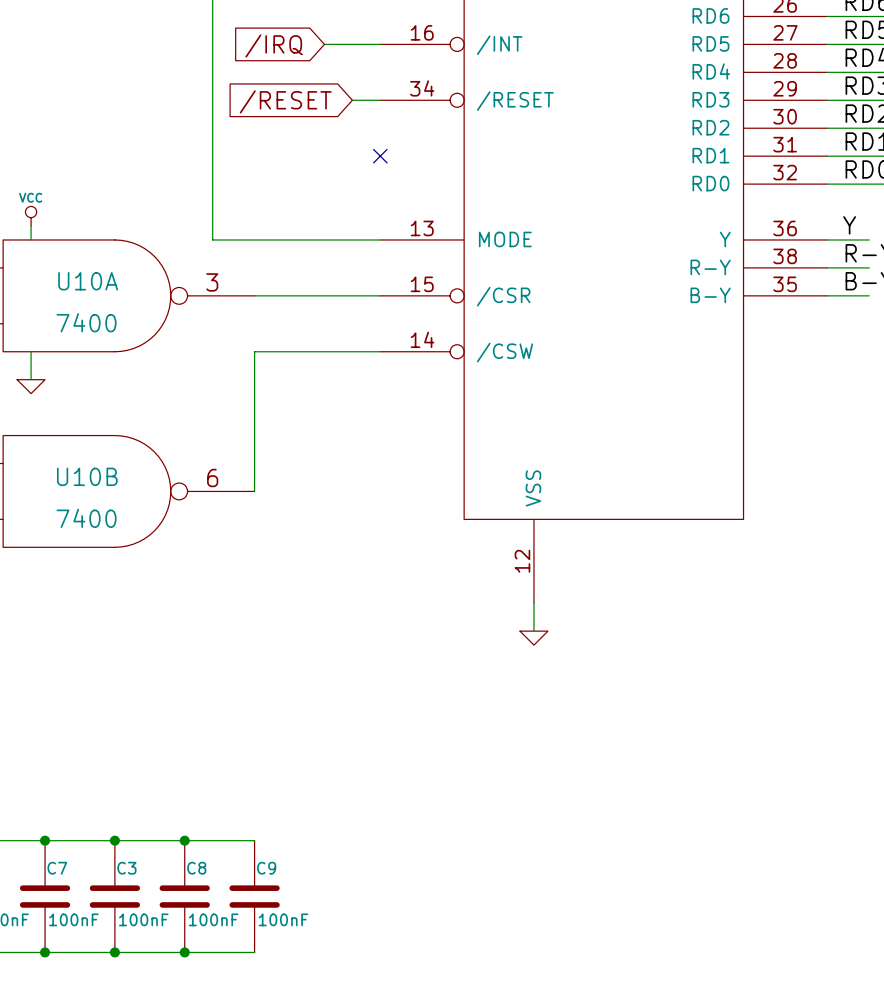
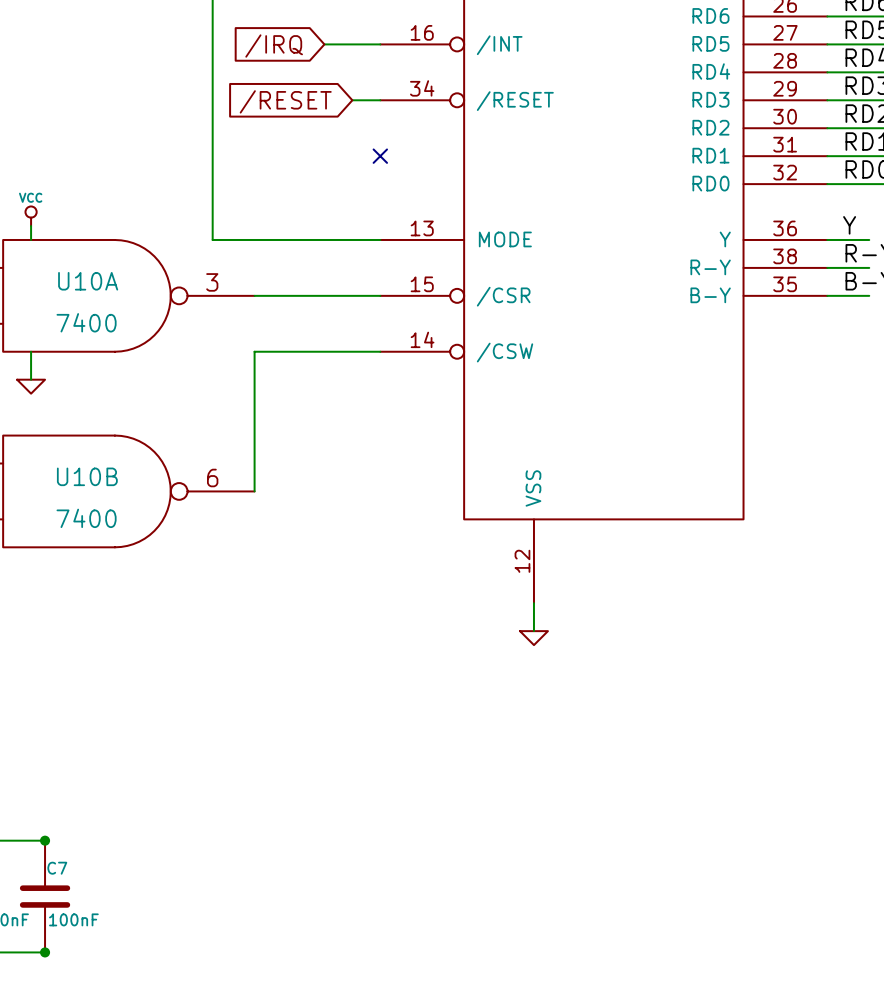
wire: (45, 840) (254, 840) -> none
junction: (114, 840) -> none
junction: (184, 840) -> none
C3: 100nF (114, 896) -> none
C8: 100nF (184, 896) -> none
C9: 100nF (254, 896) -> none
wire: (45, 952) (254, 952) -> none
junction: (114, 952) -> none
junction: (184, 952) -> none

